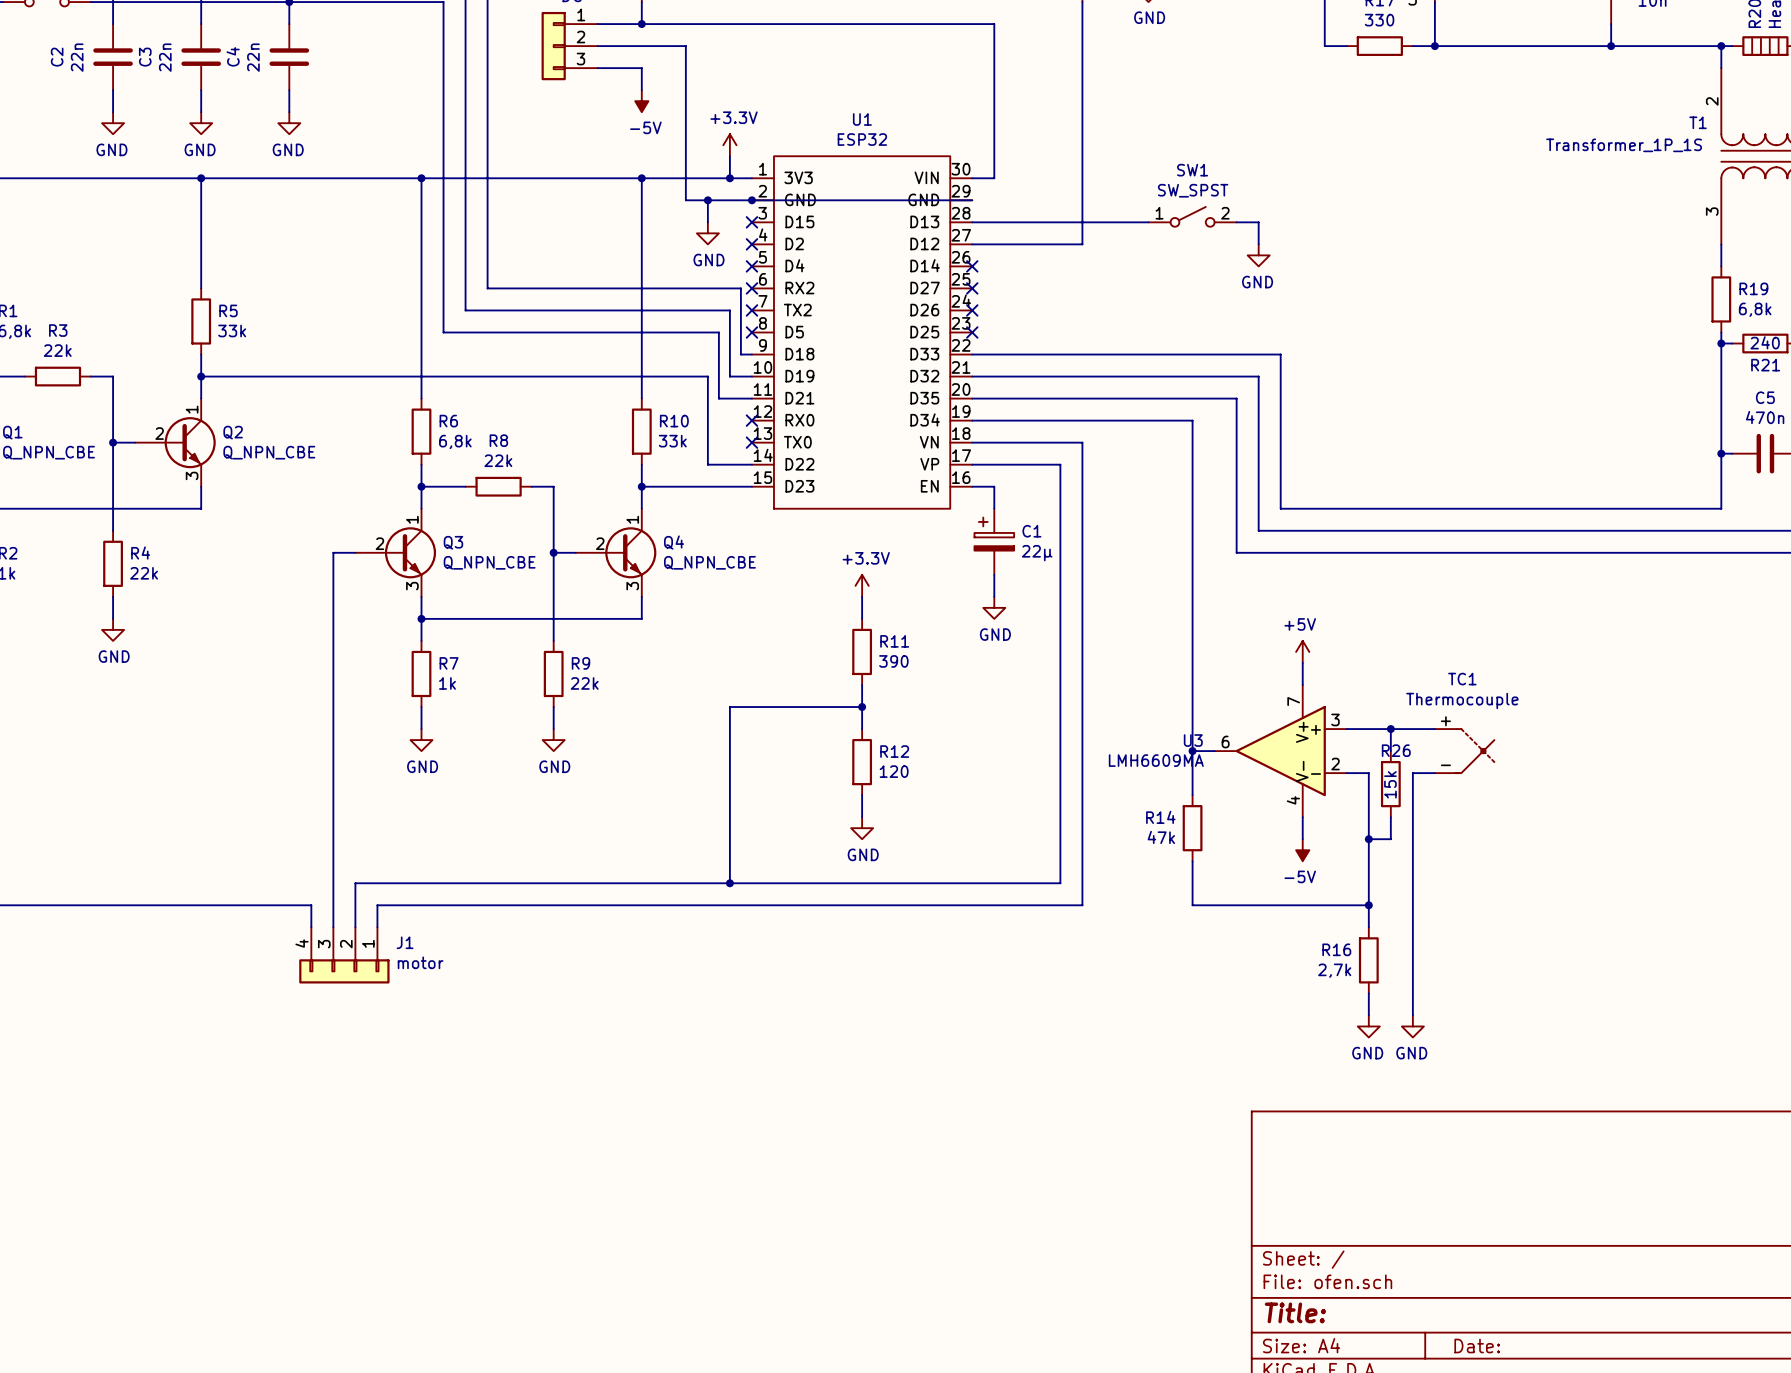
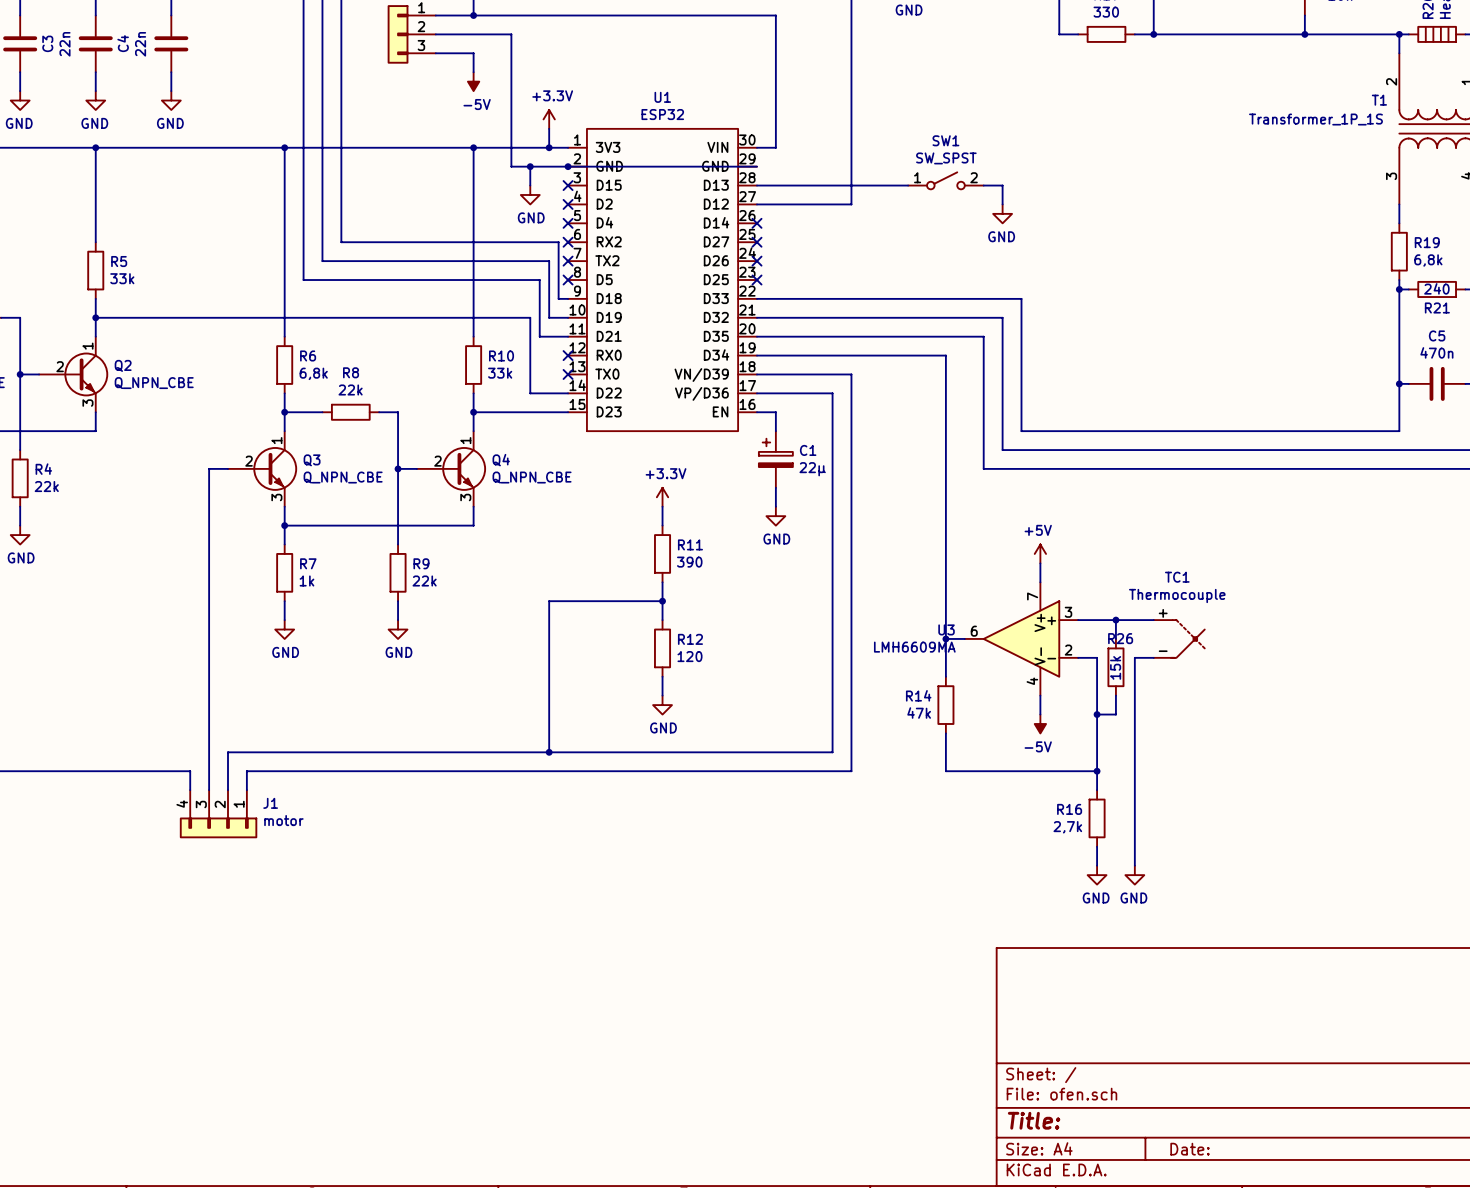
U1 pin name: VN (929, 442) -> VN/D39 (701, 375)
U1 pin name: VP (929, 464) -> VP/D36 (701, 393)

